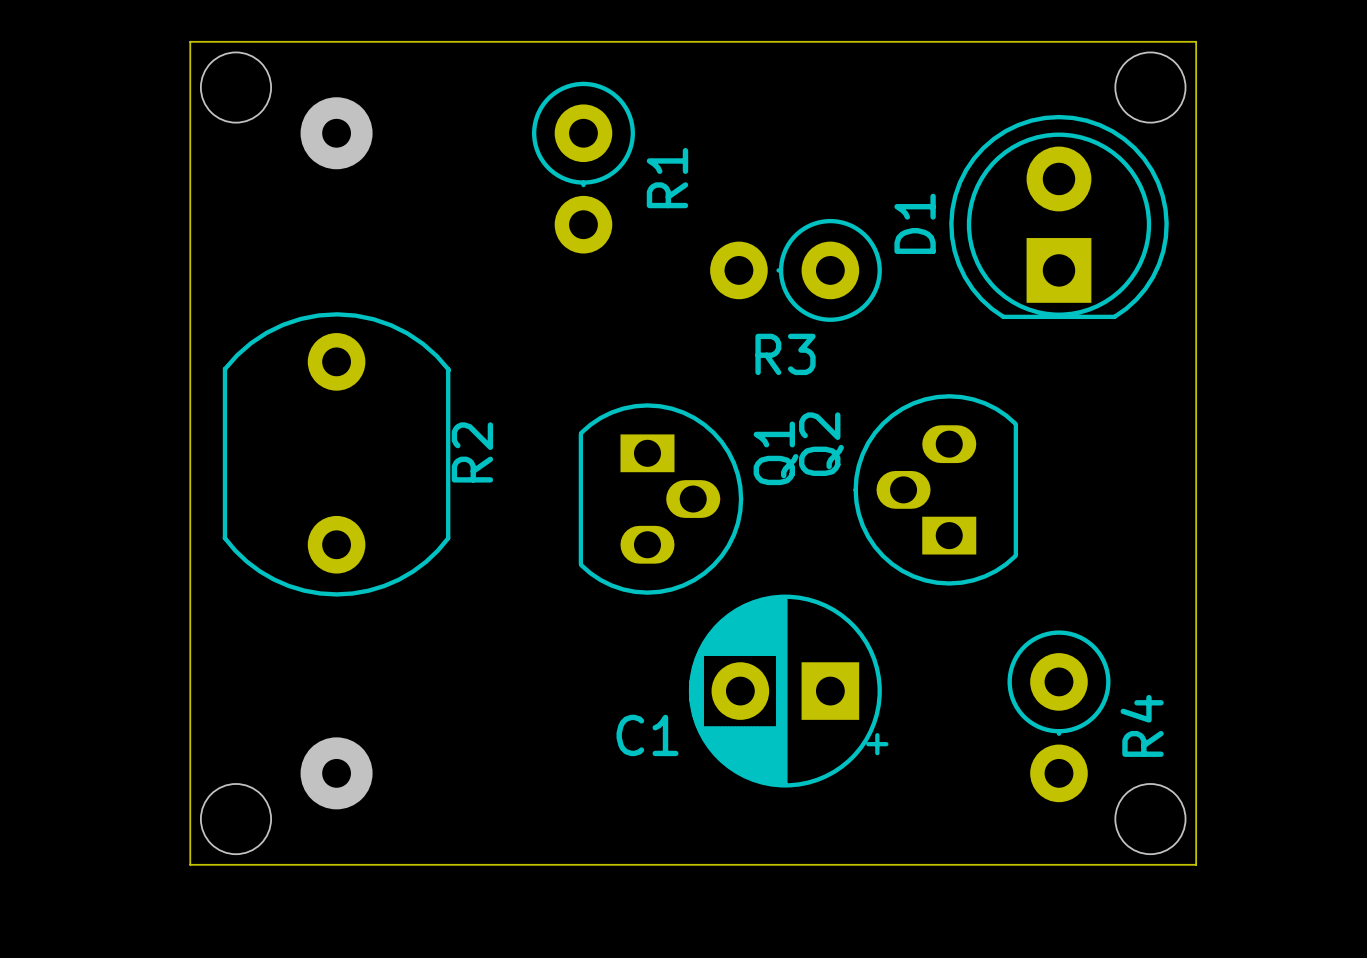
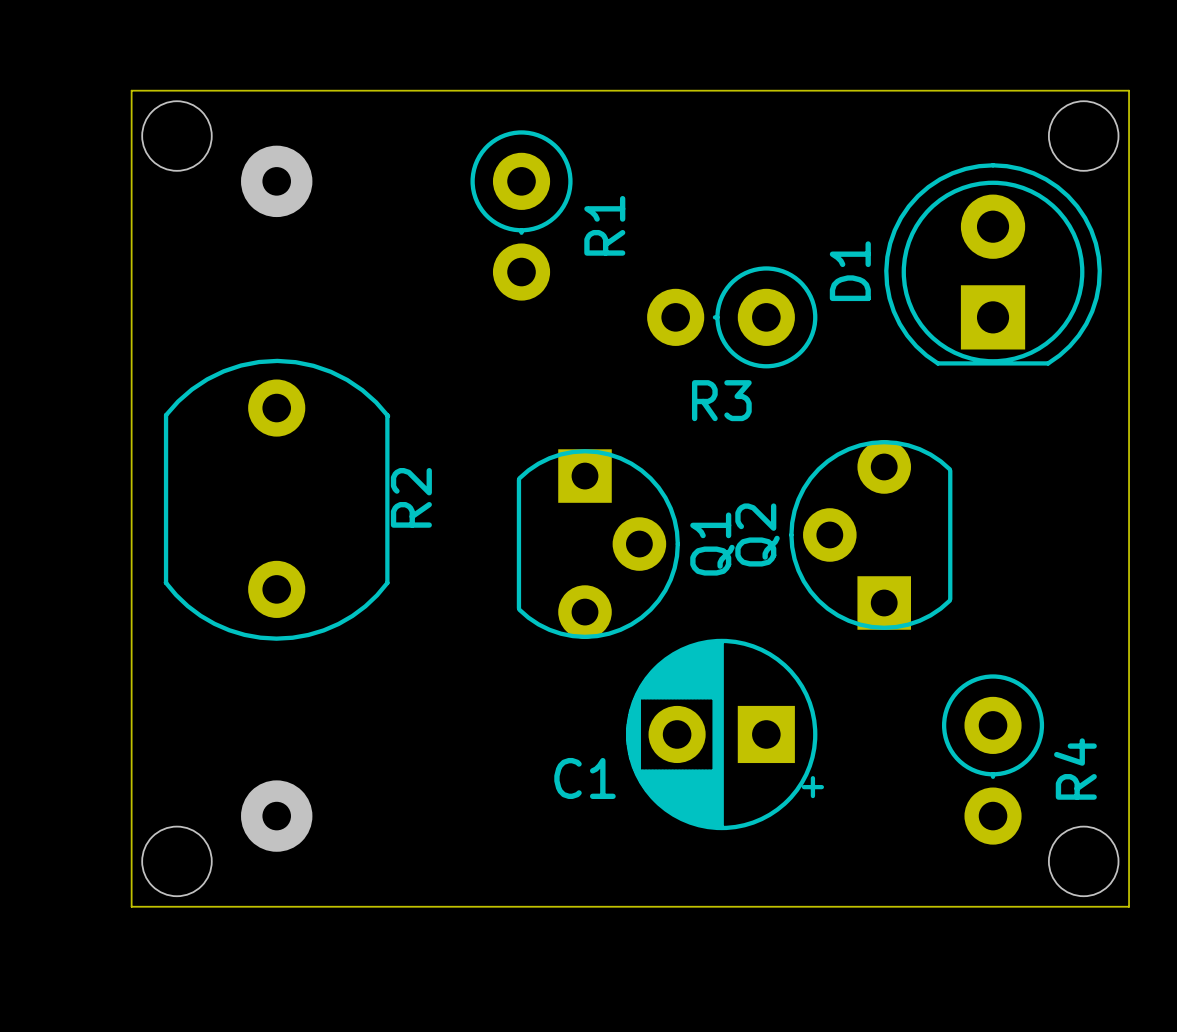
Q2 footprint: [853, 394, 1019, 586] -> [789, 440, 953, 630]
Q1 footprint: [578, 403, 744, 595] -> [516, 449, 680, 640]

